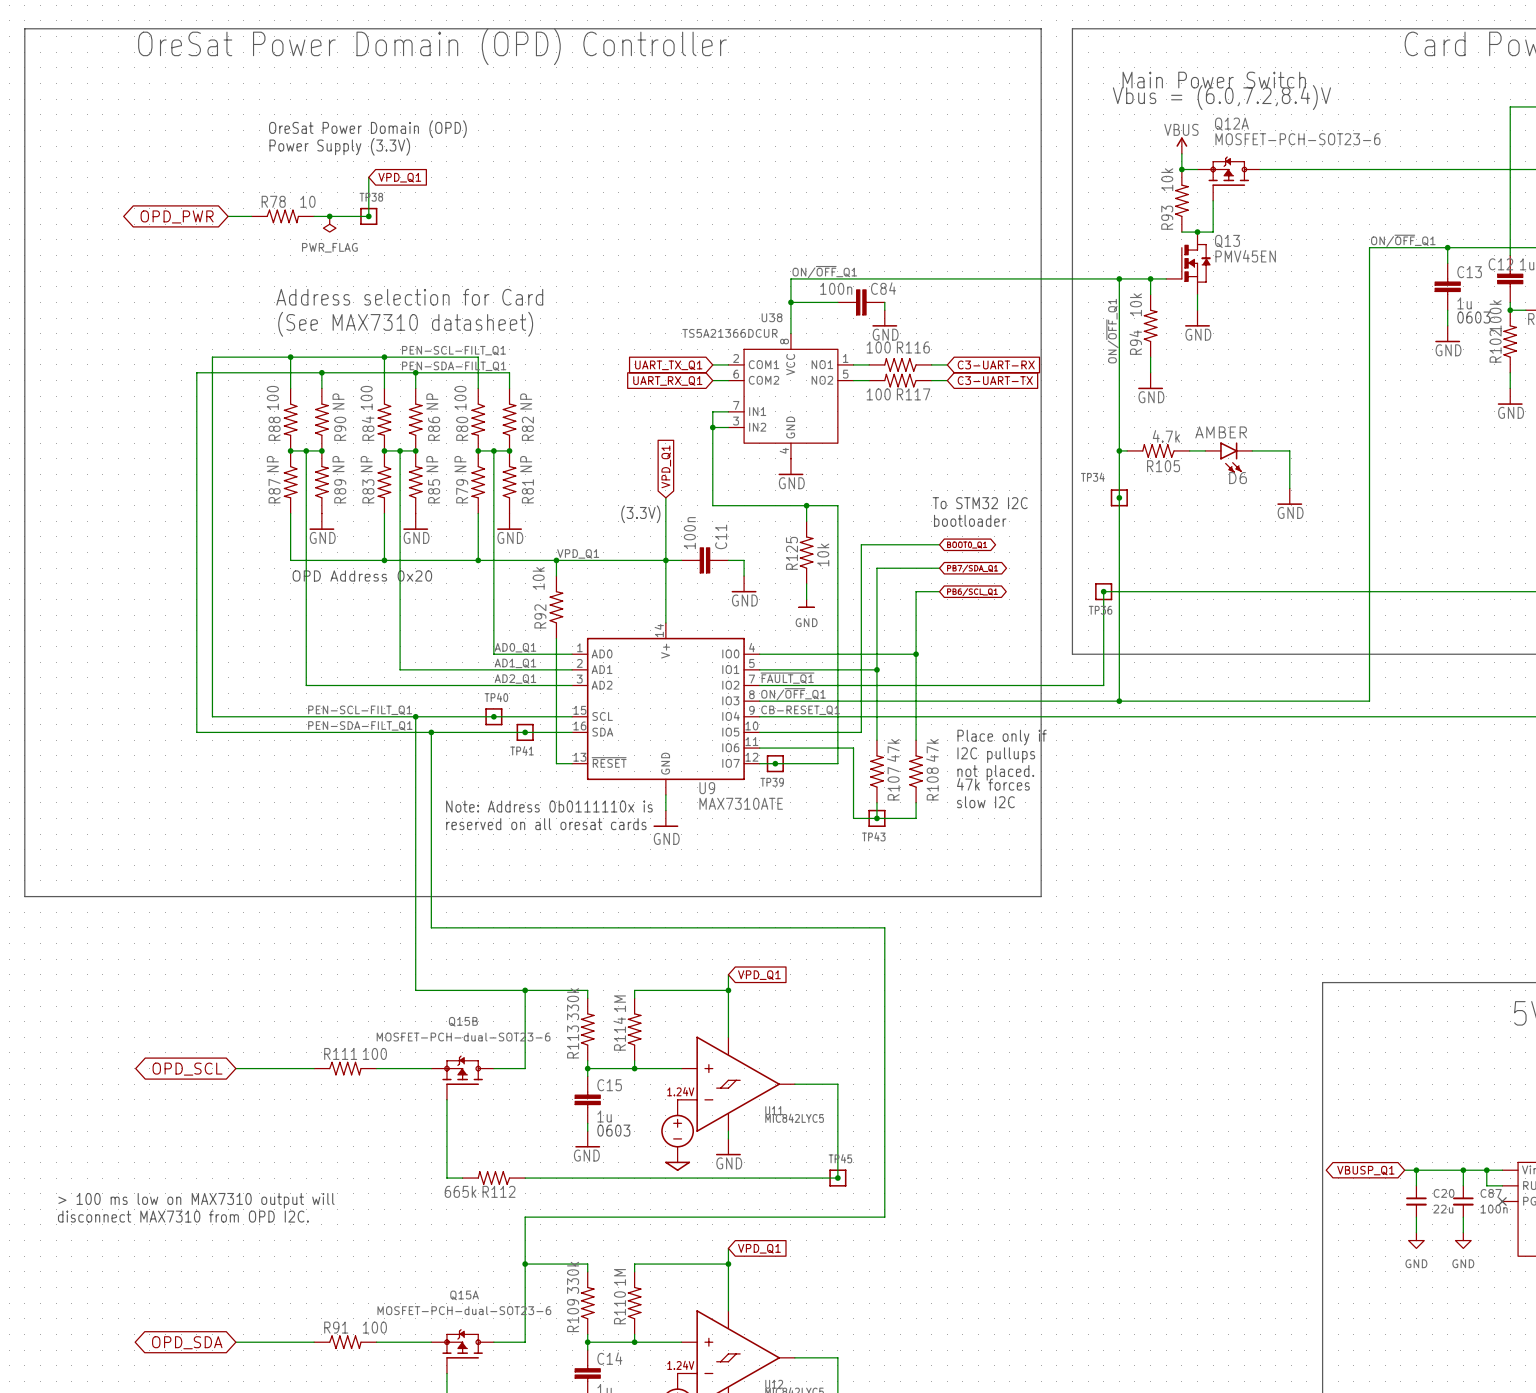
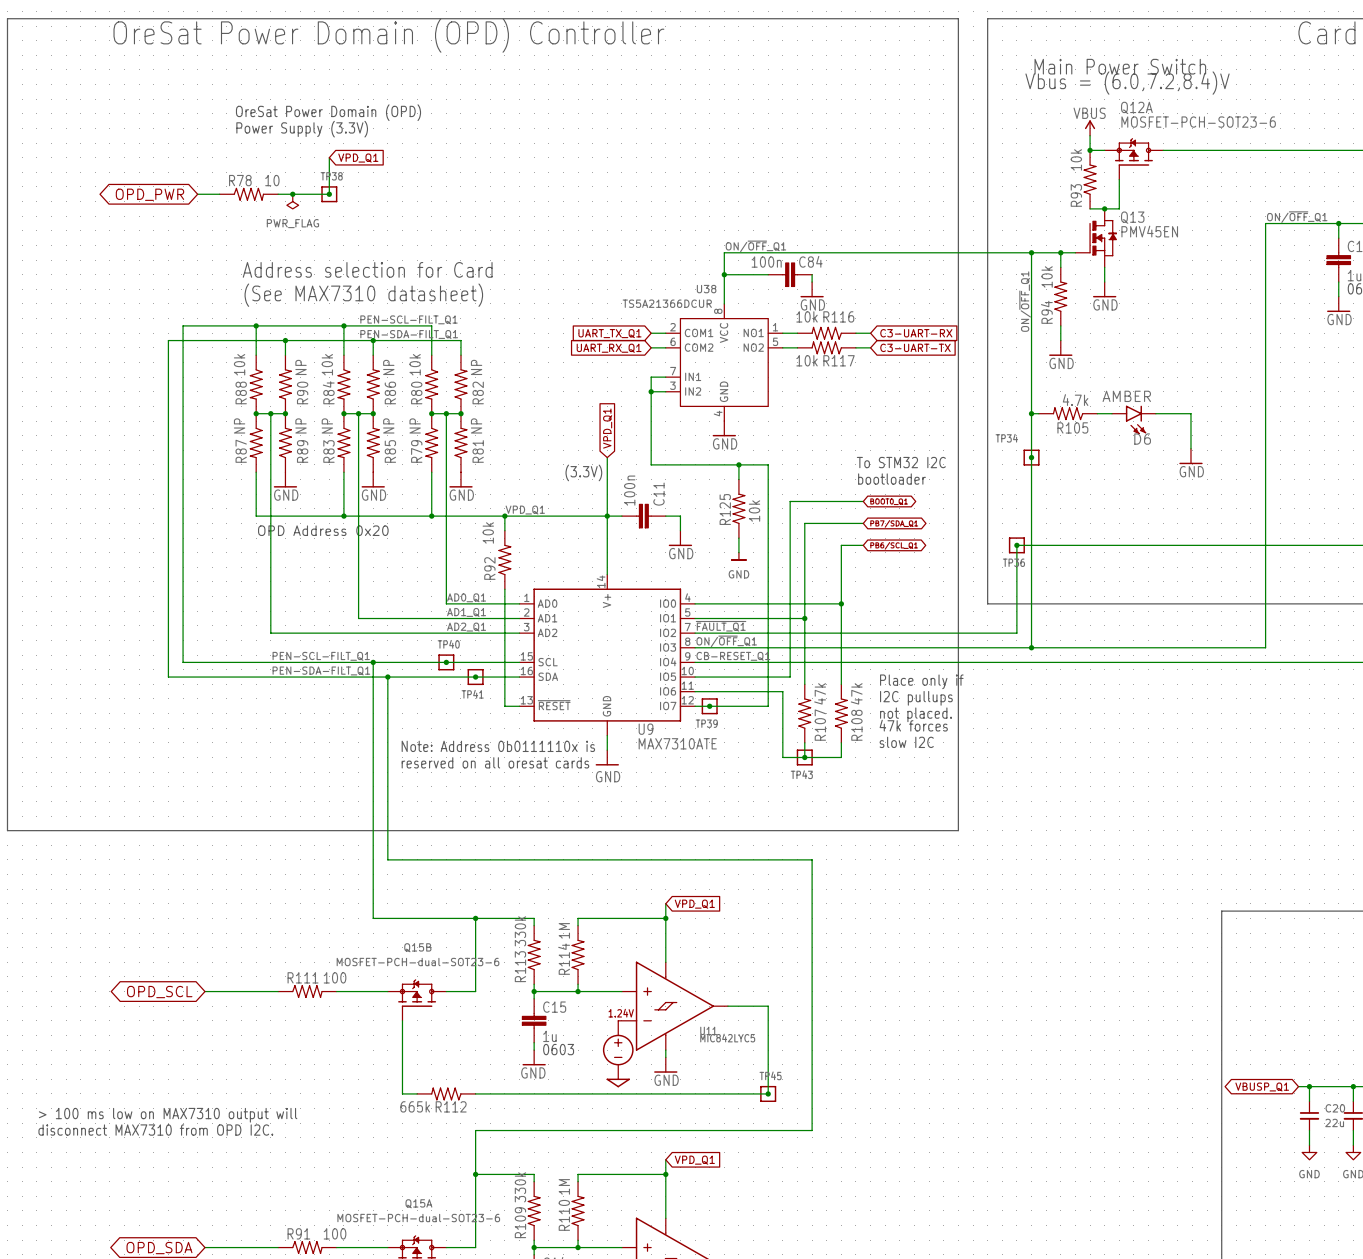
R116 value: 100 (878, 347) -> 10k (807, 316)
R117 value: 100 (878, 394) -> 10k (807, 360)
R88 value: 100 (272, 397) -> 10k (239, 364)
R84 value: 100 (366, 397) -> 10k (327, 364)
R80 value: 100 (460, 397) -> 10k (415, 364)

